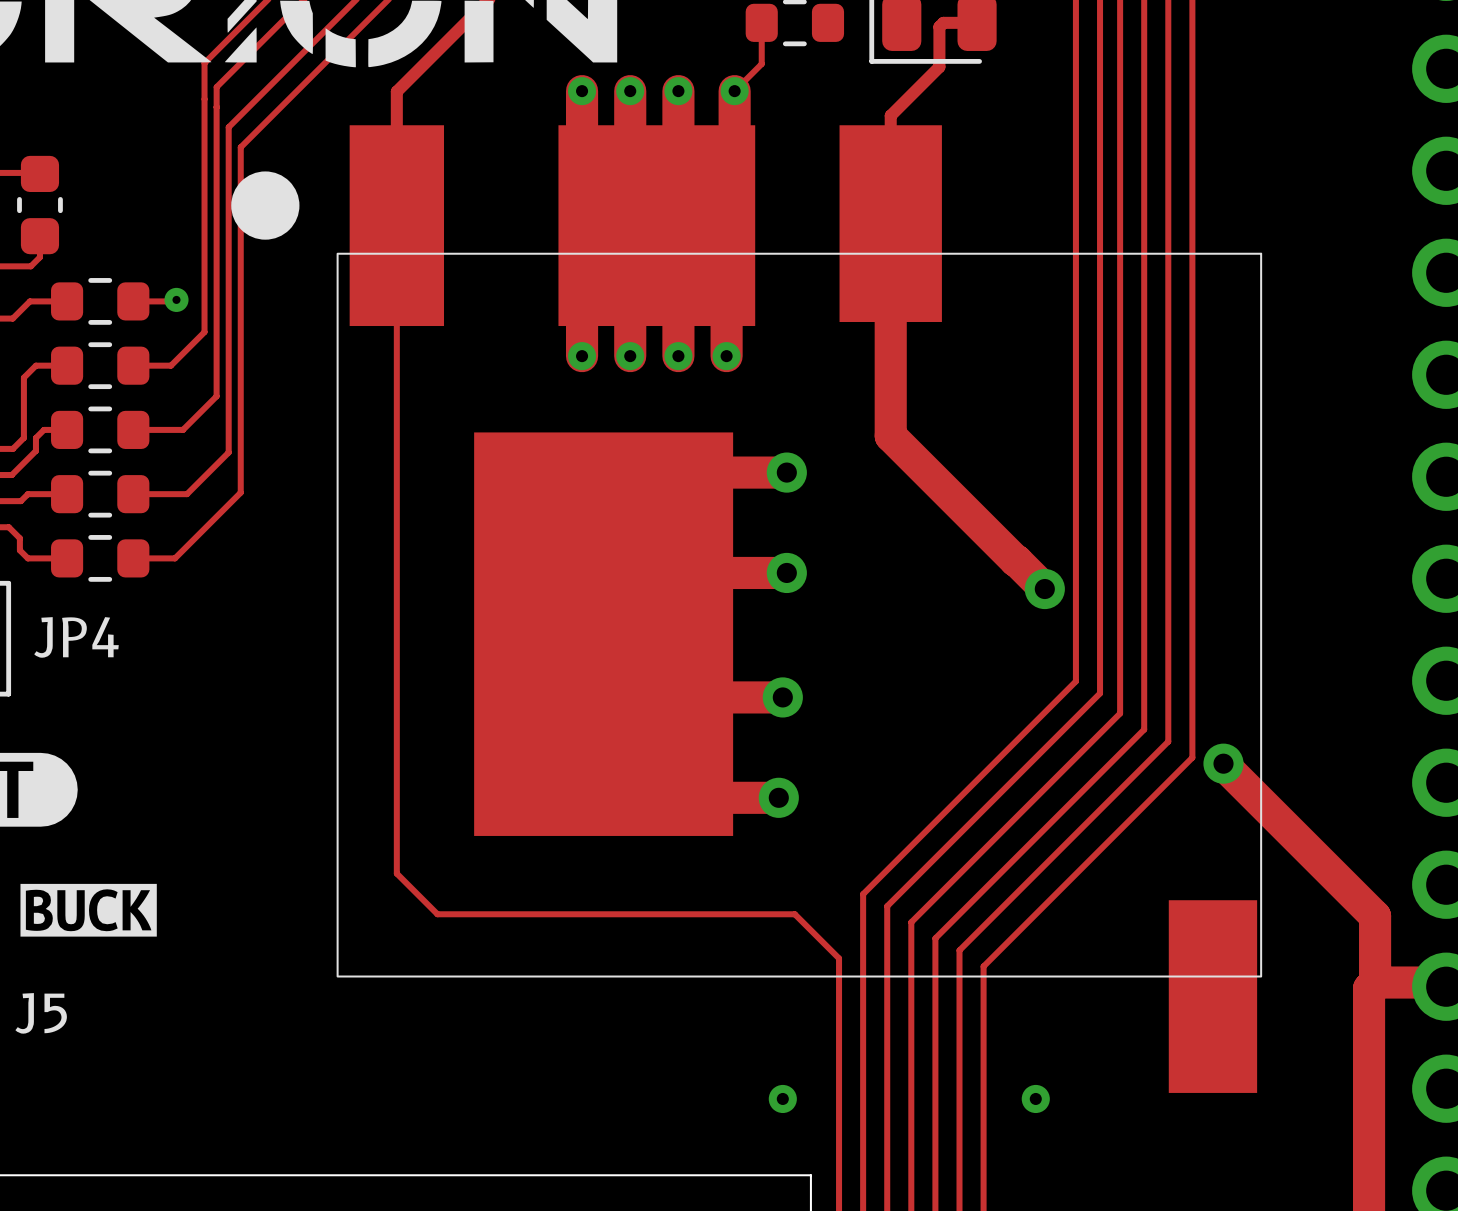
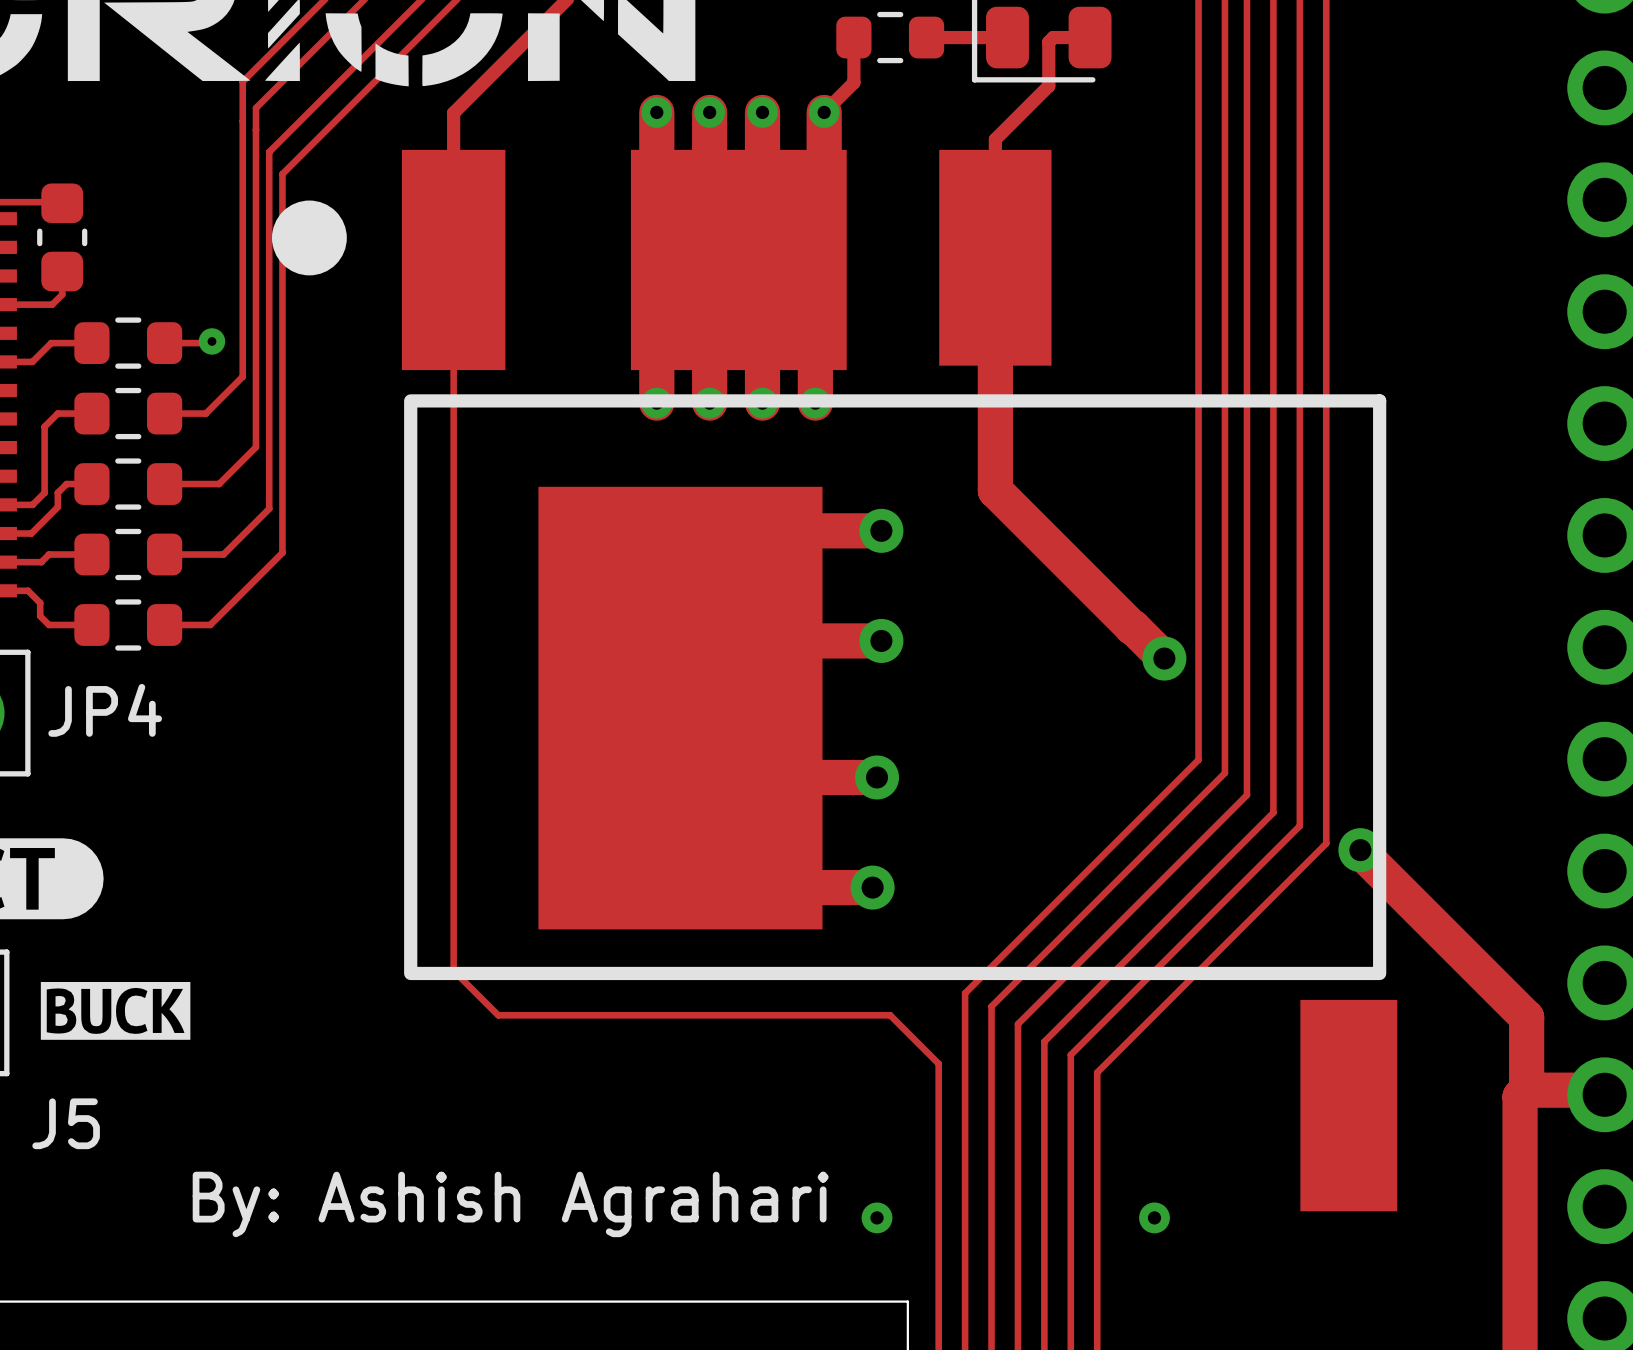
track width: thin (761, 22) (761, 64) (734, 91) -> thick (853, 37) (853, 82) (824, 112)
track: none -> (926, 37) (1007, 37)
part footprint: [231, 125, 1263, 1093] -> [271, 149, 1398, 1212]
text: none -> By: Ashish Agrahari (510, 1204)

